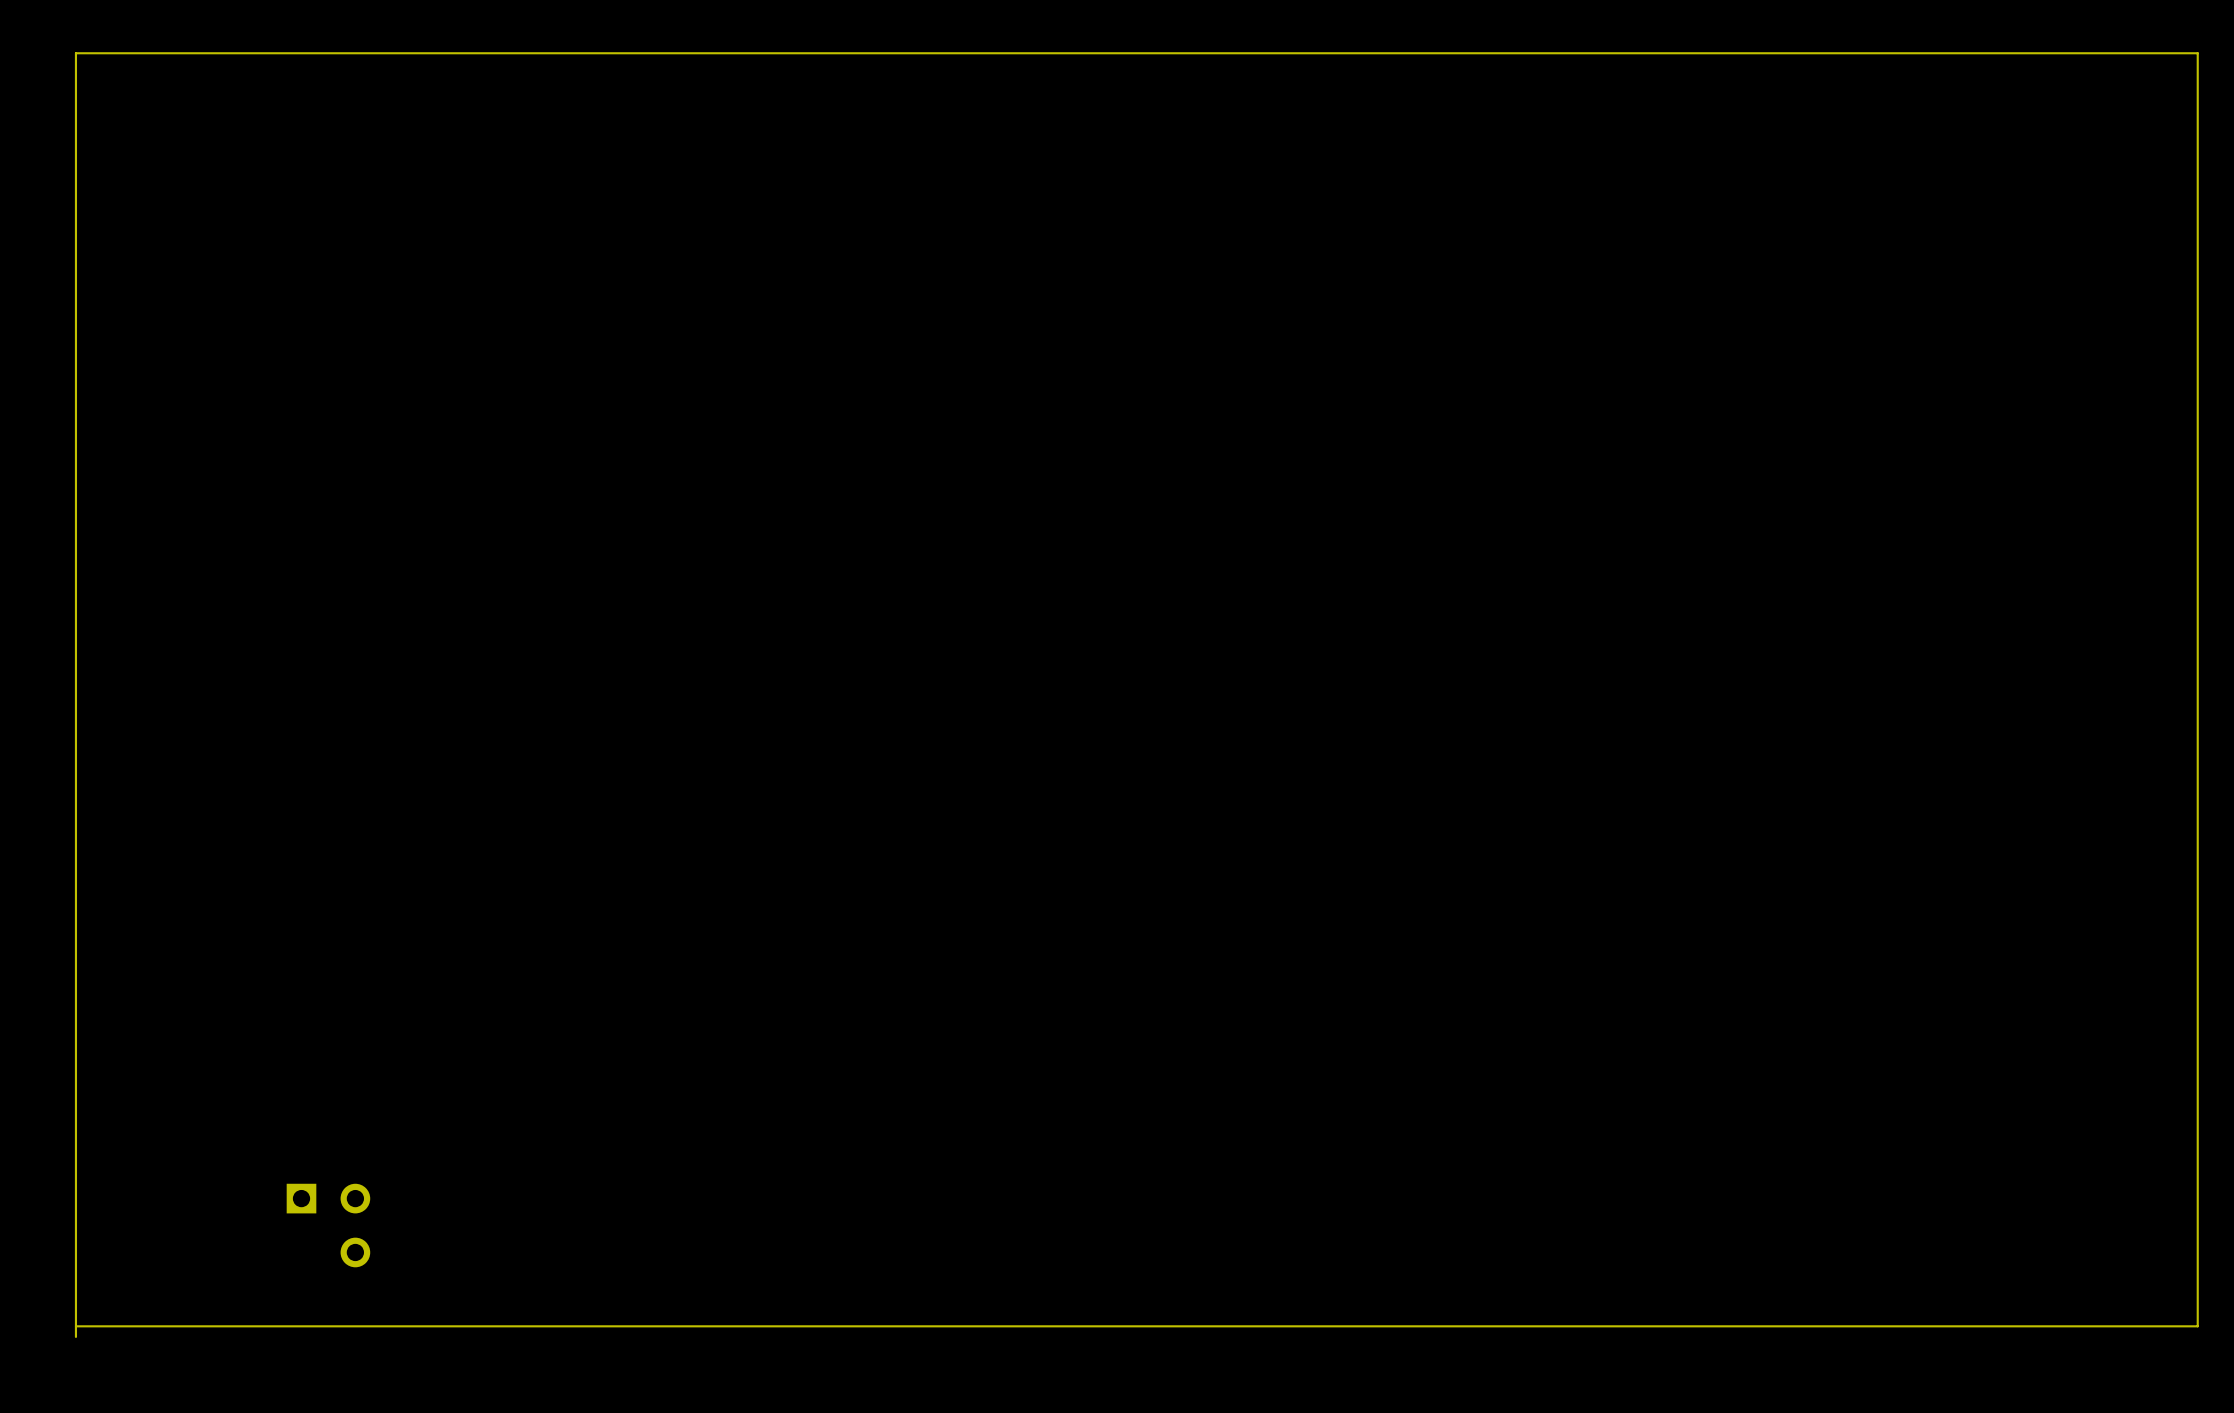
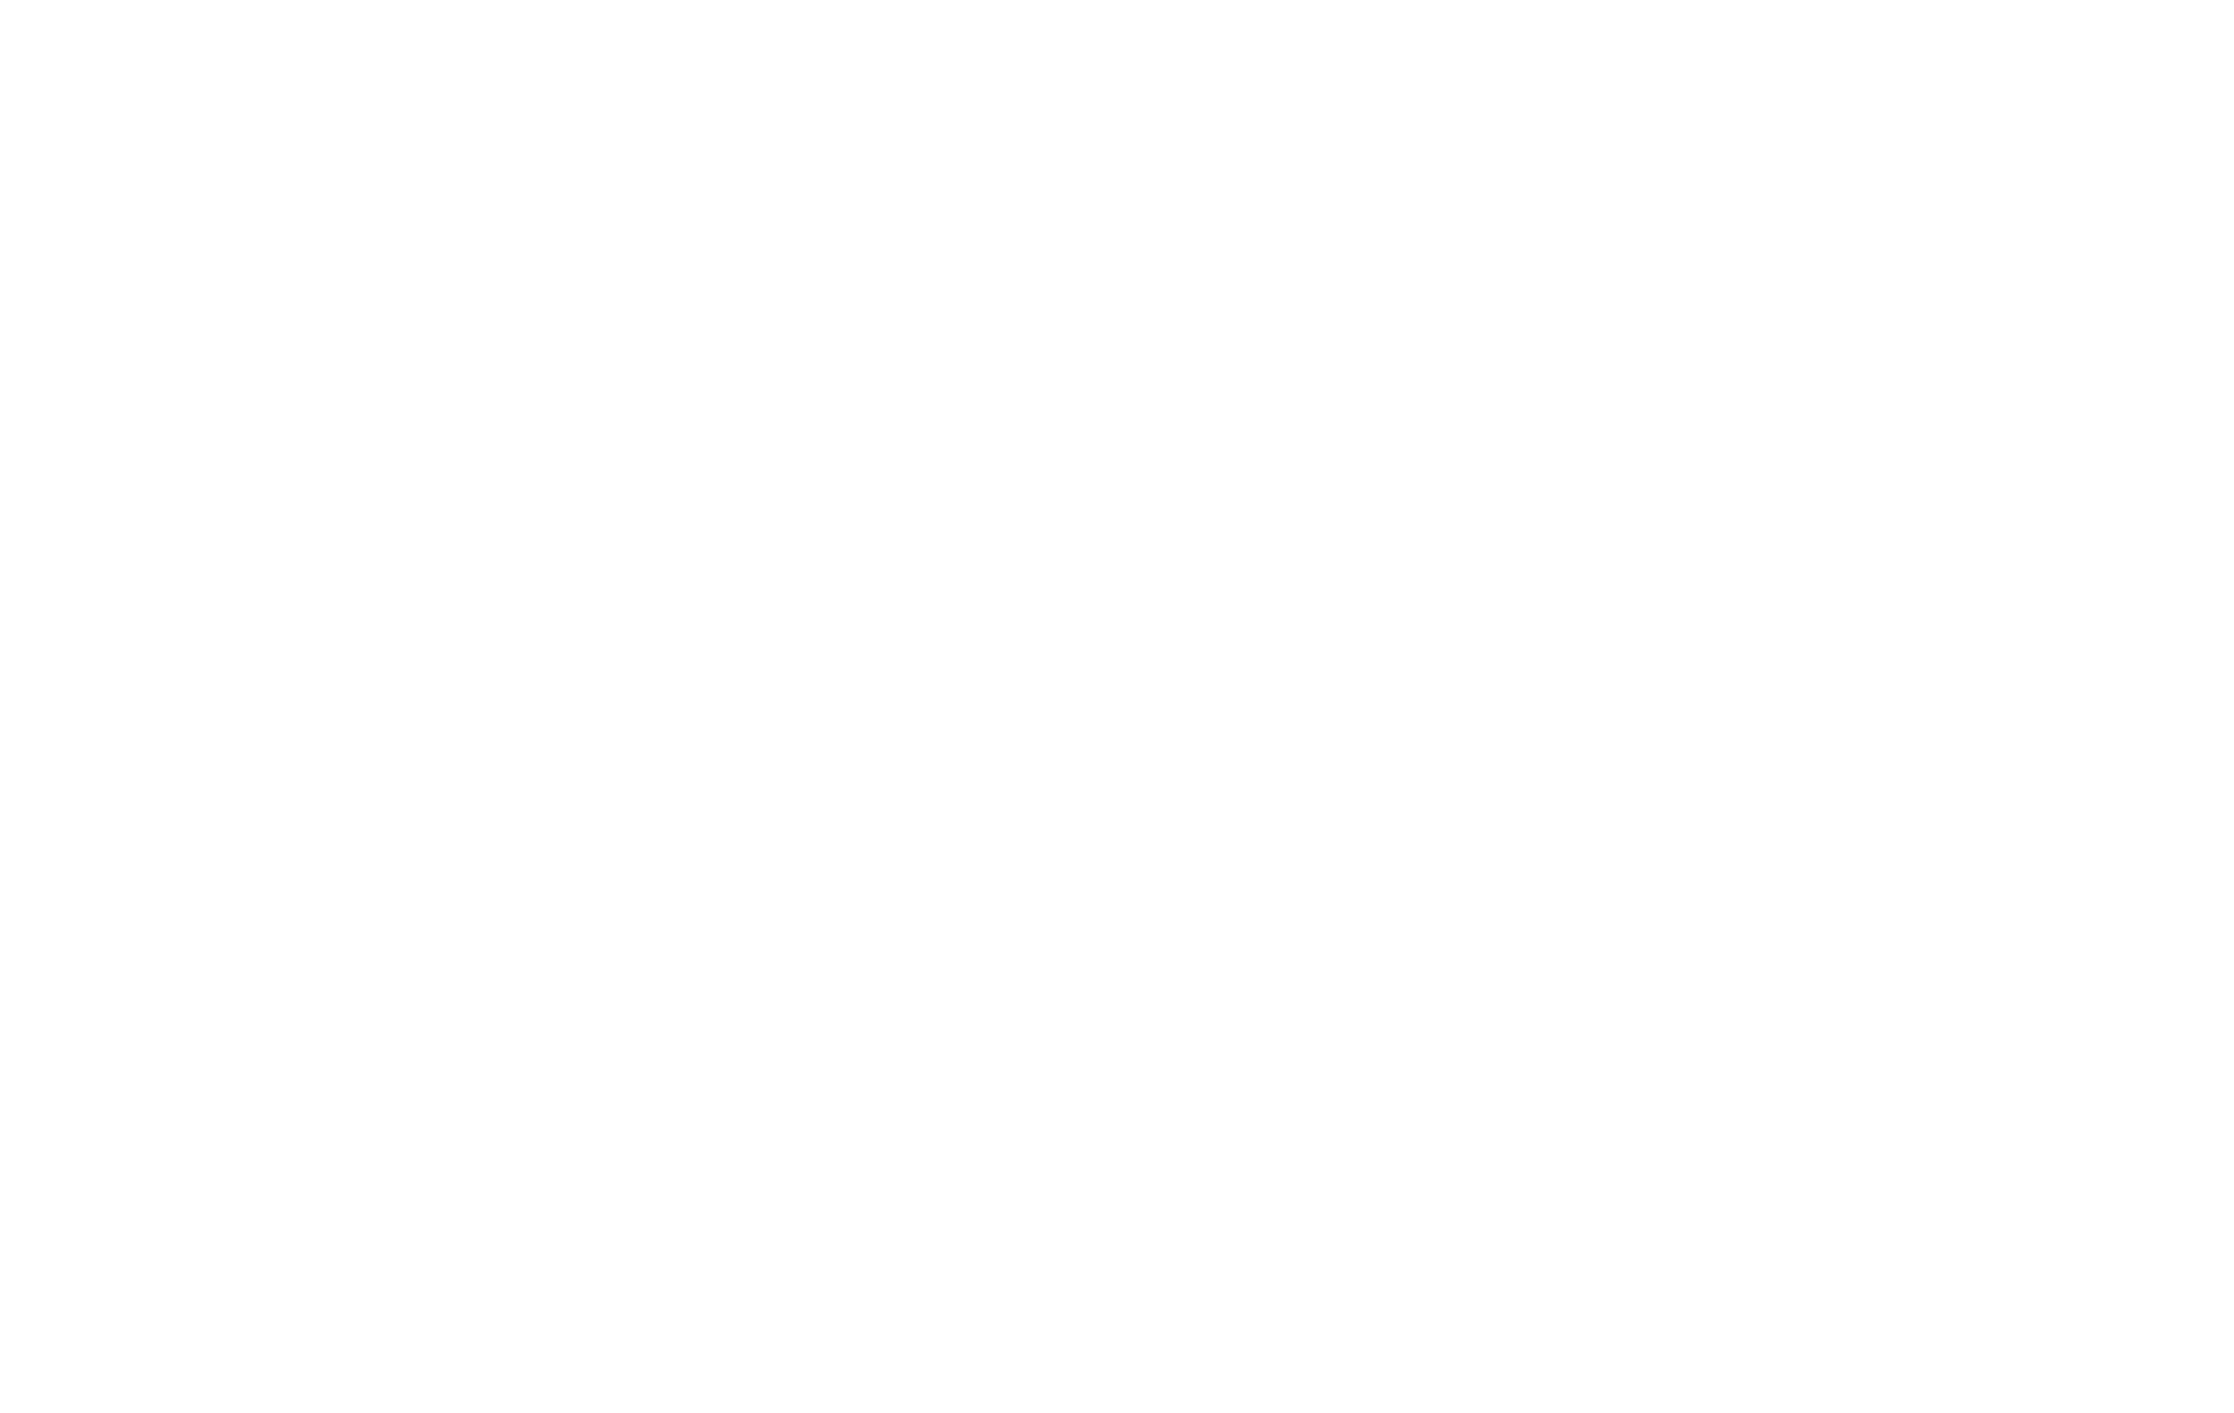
part: (328, 1225) -> none
board edge: (75, 1326) (2197, 1326) (2197, 53) (75, 53) (75, 1336) -> none

